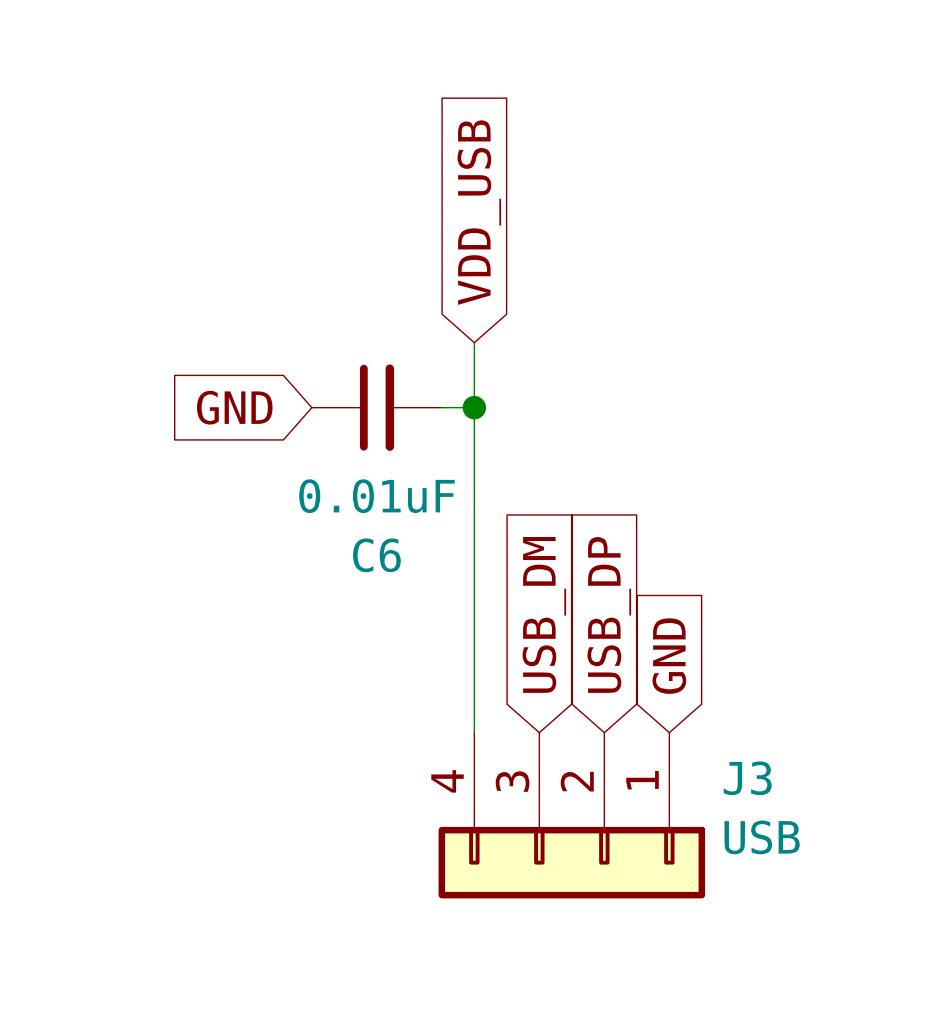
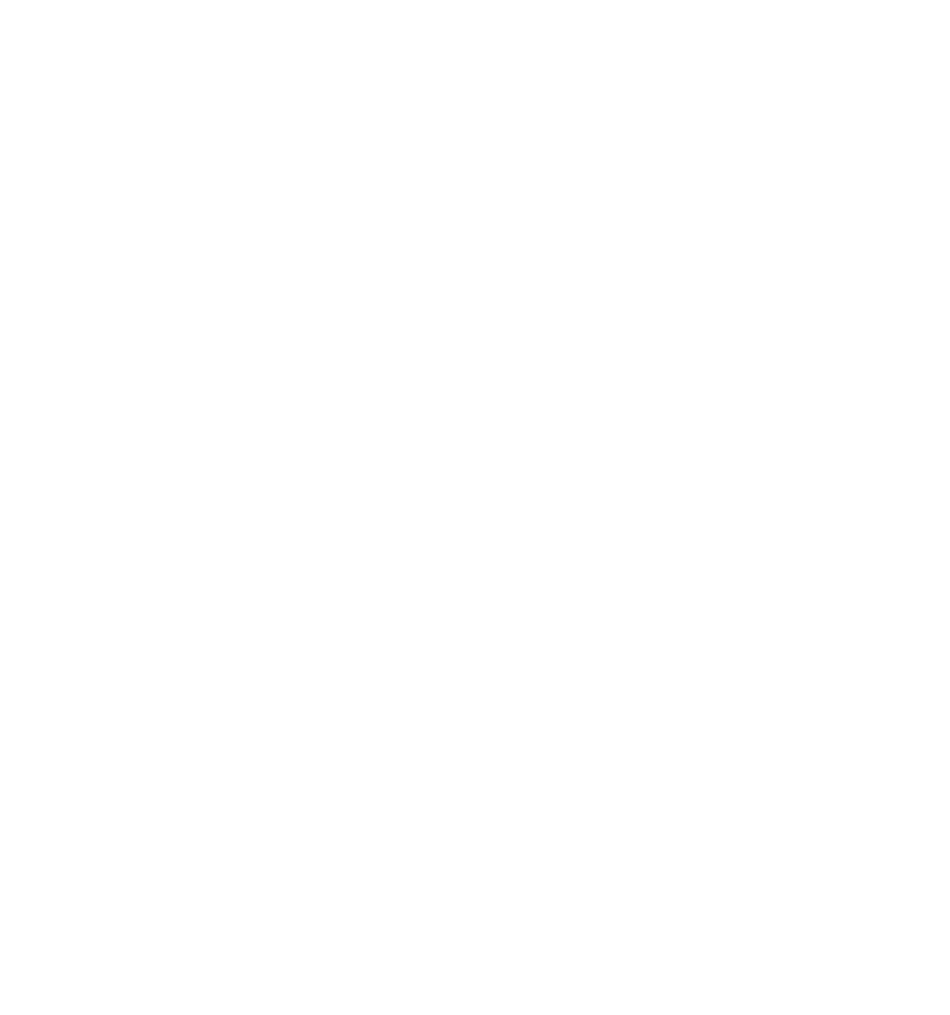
global label: VDD_USB (479, 212) -> none
wire: (474, 342) (474, 732) -> none
global label: GND (234, 407) -> none
C6: 0.01uF (376, 407) -> none
wire: (441, 407) (474, 407) -> none
junction: (474, 407) -> none
global label: USB_DM (544, 614) -> none
global label: USB_DP (609, 614) -> none
global label: GND (669, 656) -> none
J3: USB (571, 815) -> none

